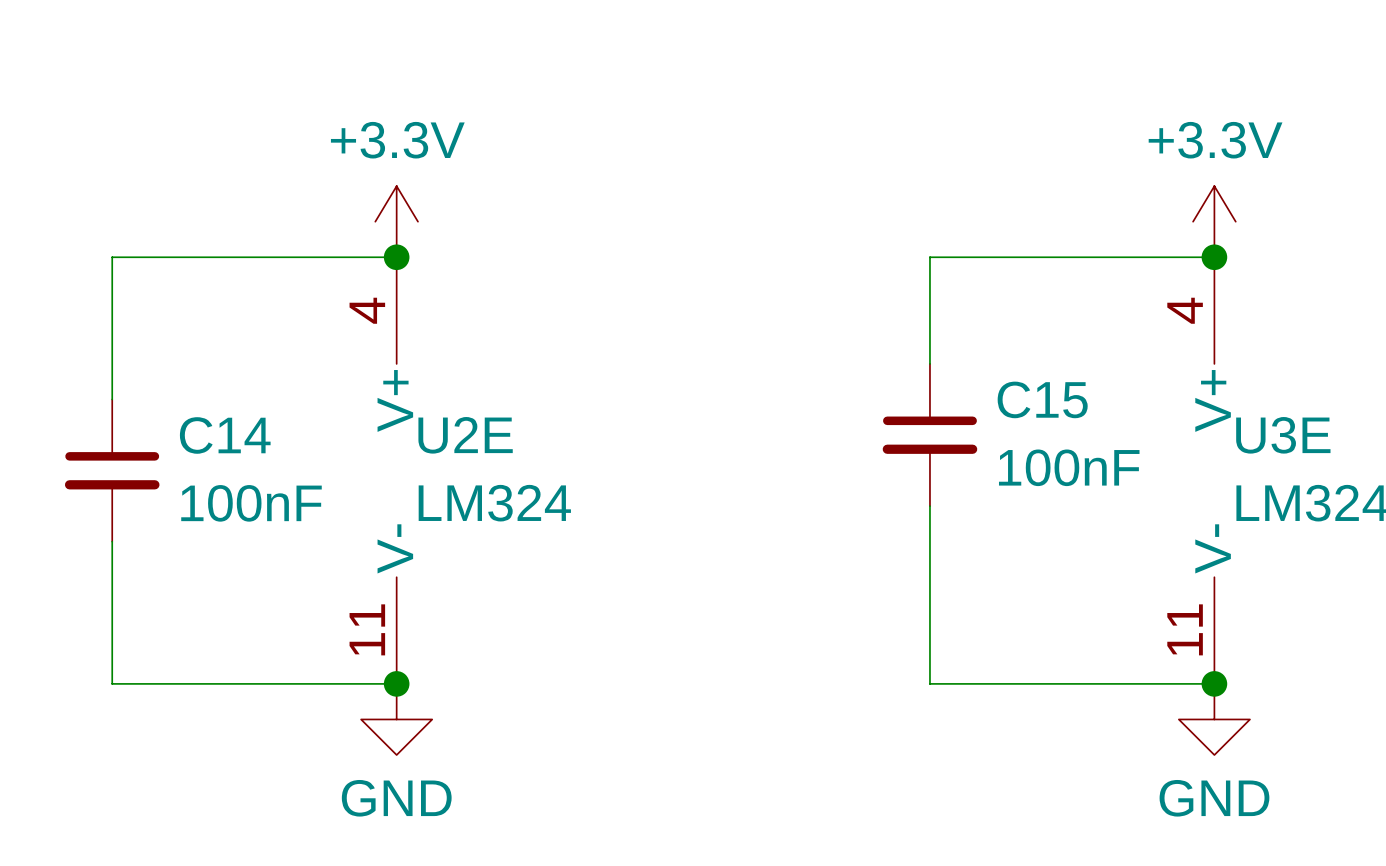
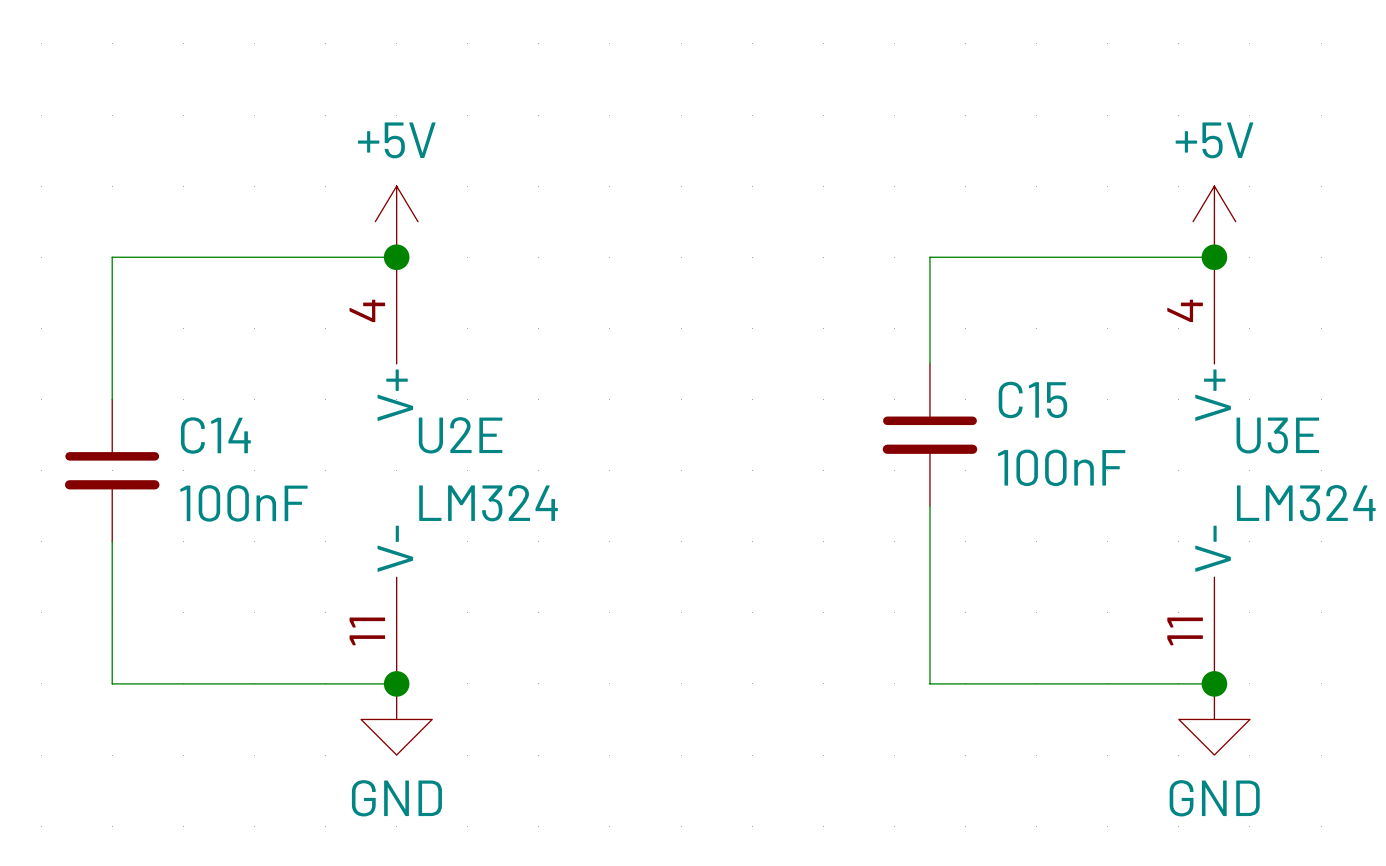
power symbol: +3.3V (396, 221) -> +5V (396, 221)
power symbol: +3.3V (1214, 221) -> +5V (1214, 221)

